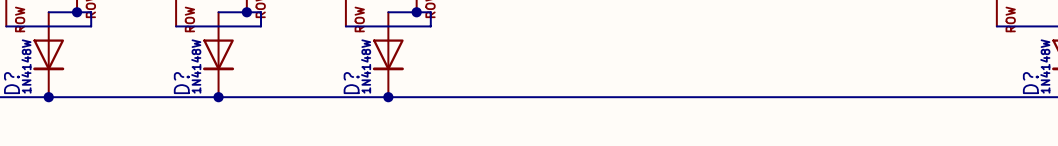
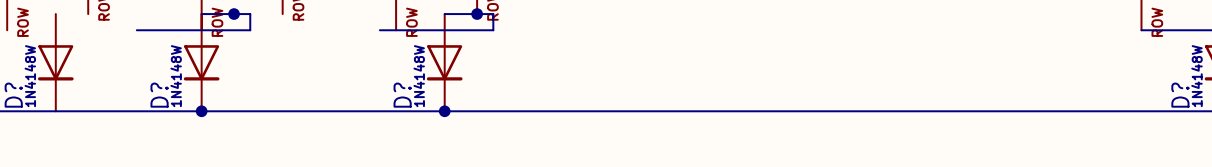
wire: (48, 12) (91, 12) (91, 26) (6, 26) -> none
junction: (77, 12) -> none
junction: none -> (234, 14)
wire: (218, 12) (261, 12) (261, 26) (218, 26) -> (201, 14) (250, 14) (250, 30)
junction: (246, 12) -> none
wire: none -> (136, 30) (201, 30)
wire: none -> (379, 30) (396, 30)
D? position: (218, 54) -> (201, 62)
junction: (48, 97) -> none
junction position: (218, 97) -> (201, 111)

